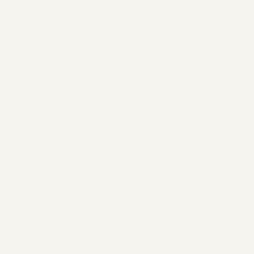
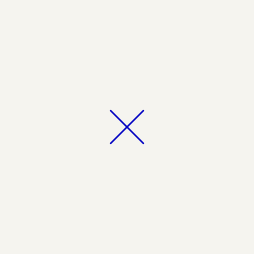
no-connect mark: none -> (127, 127)

